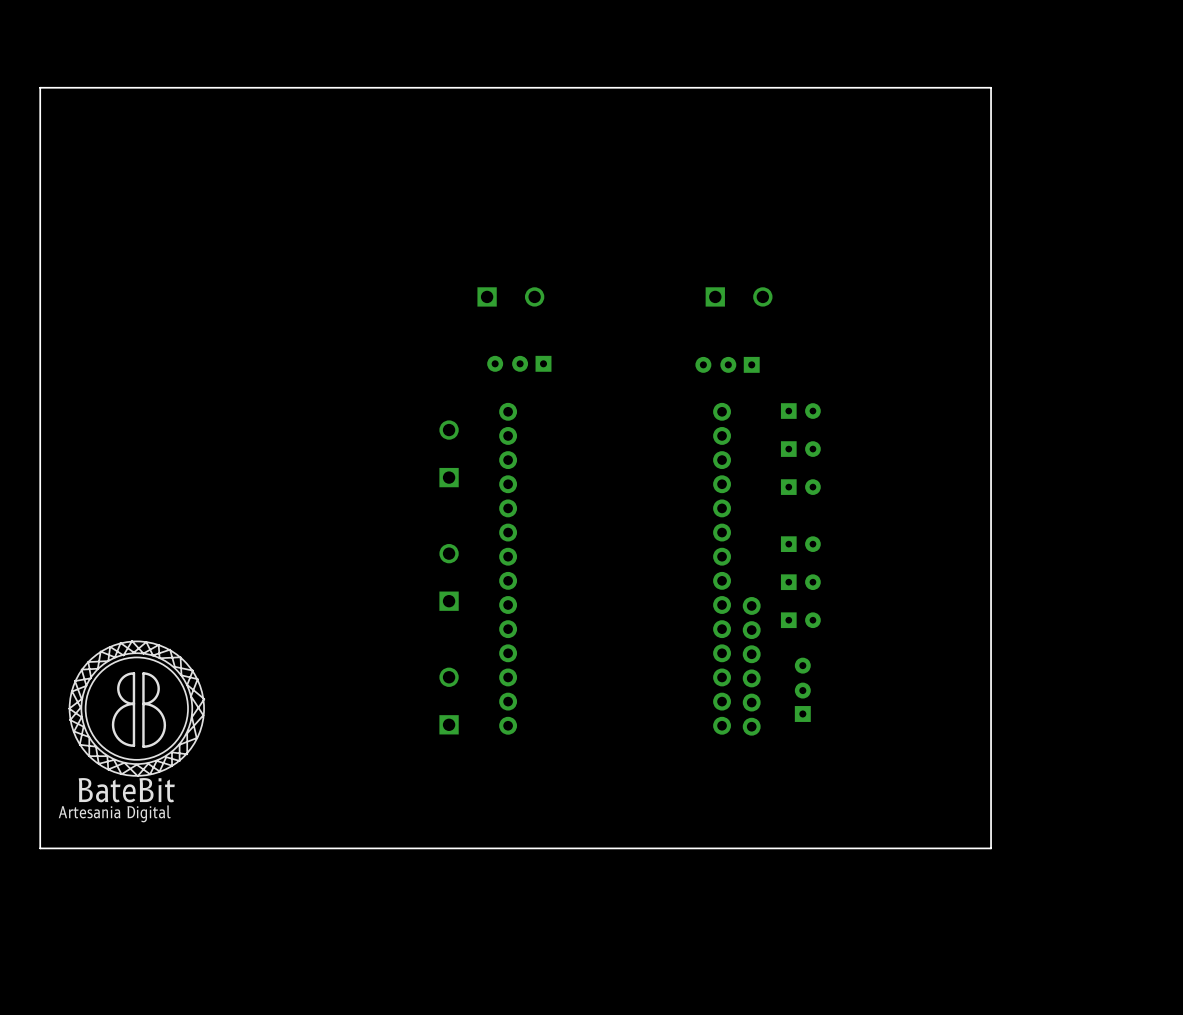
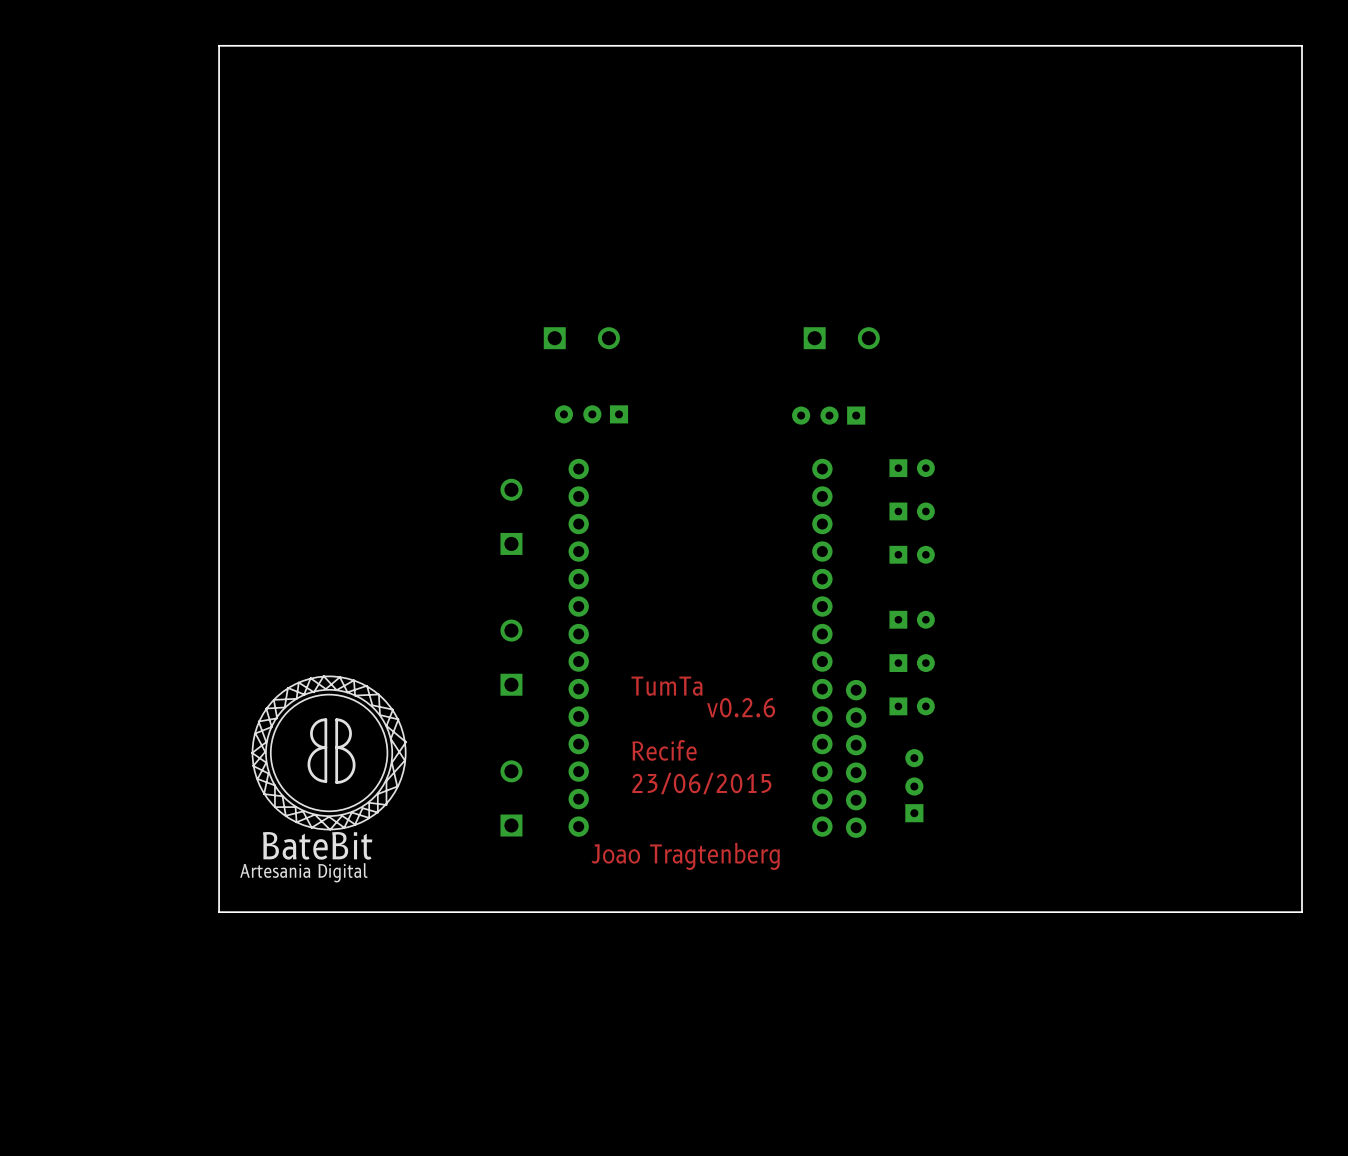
board edge: (40, 87) (991, 87) (991, 848) (40, 848) (40, 87) -> (219, 45) (219, 912) (1302, 912) (1302, 45) (219, 45)
drawing: none -> [251, 675, 407, 831]
text: none -> TumTa (667, 686)
text: none -> v0.2.6 (741, 707)
drawing: [68, 640, 205, 777] -> none
text: none -> Recife (664, 750)
text: none -> 23/06/2015 (701, 783)
text: none -> Joao Tragtenberg (685, 856)

